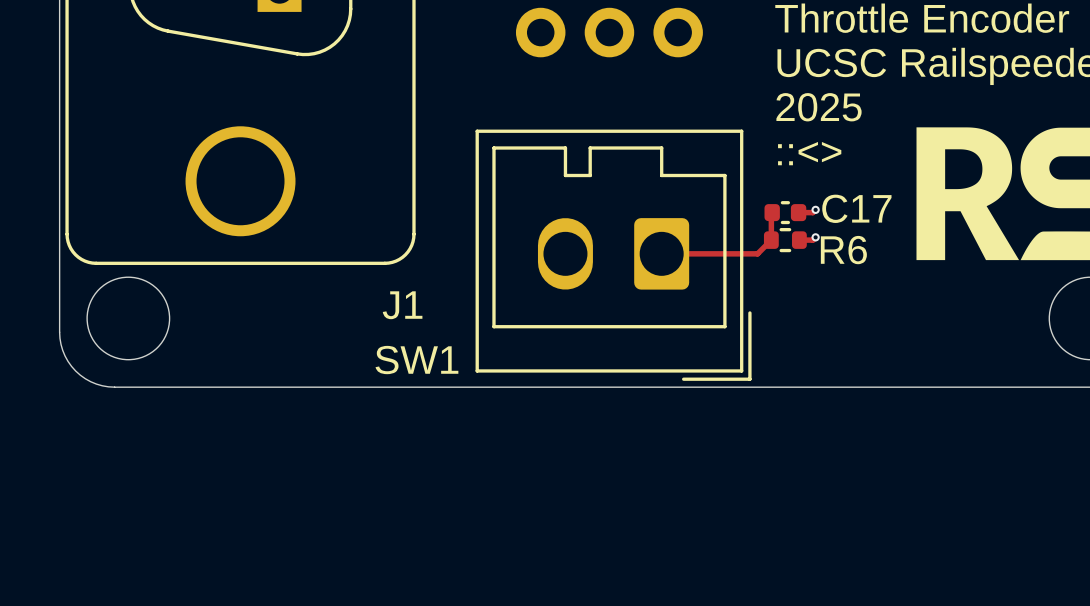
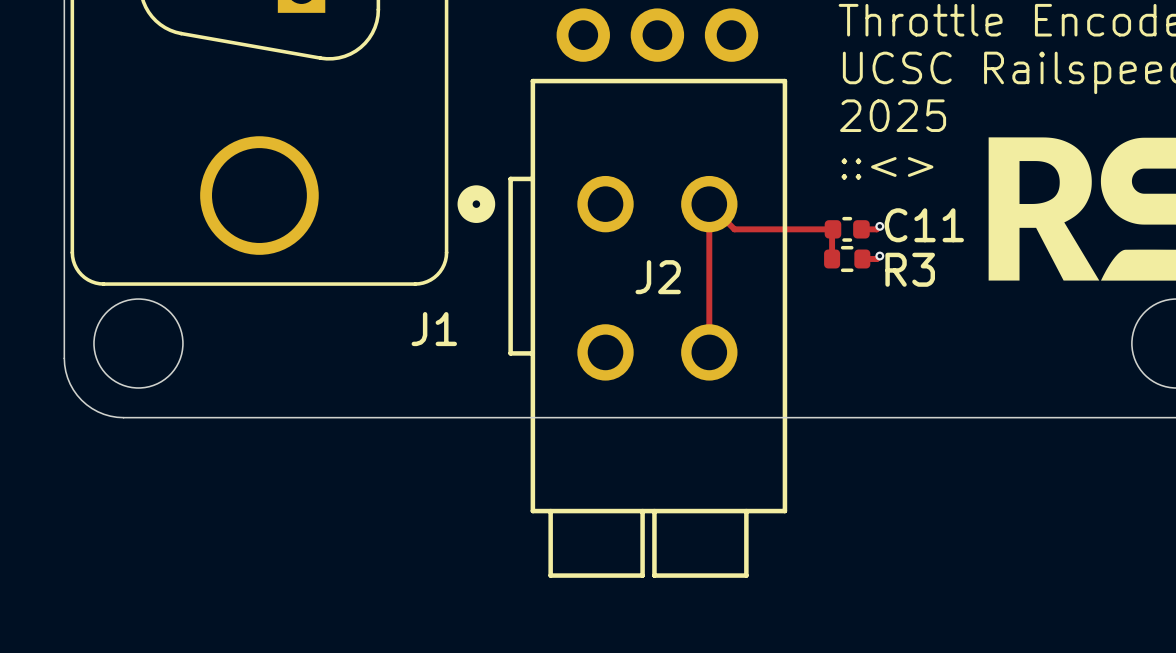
C17 name: C17 (856, 208) -> C11 (924, 225)
track: none -> (832, 229) (734, 229) (709, 204) (709, 352)
track: (771, 240) (757, 253) (661, 253) -> none
R6 name: R6 (843, 250) -> R3 (910, 269)
SW1: (613, 255) -> none
J2: none -> (622, 328)

